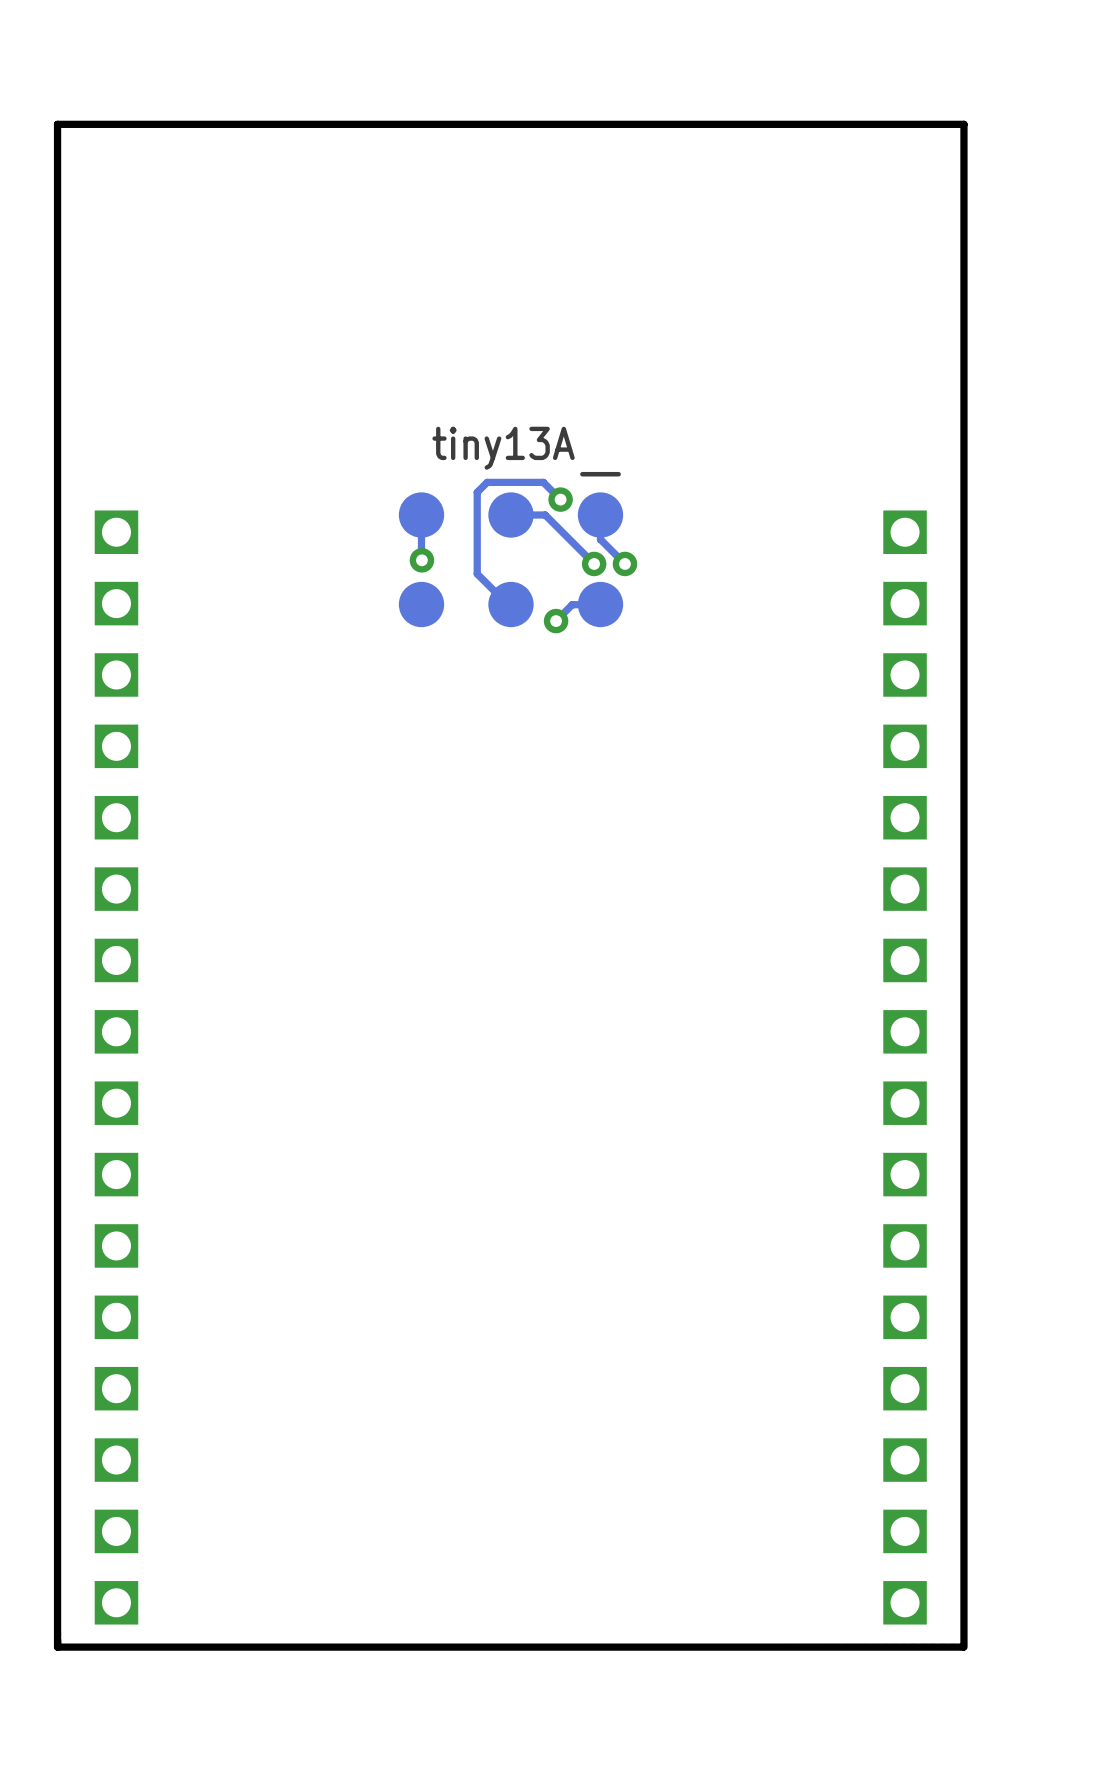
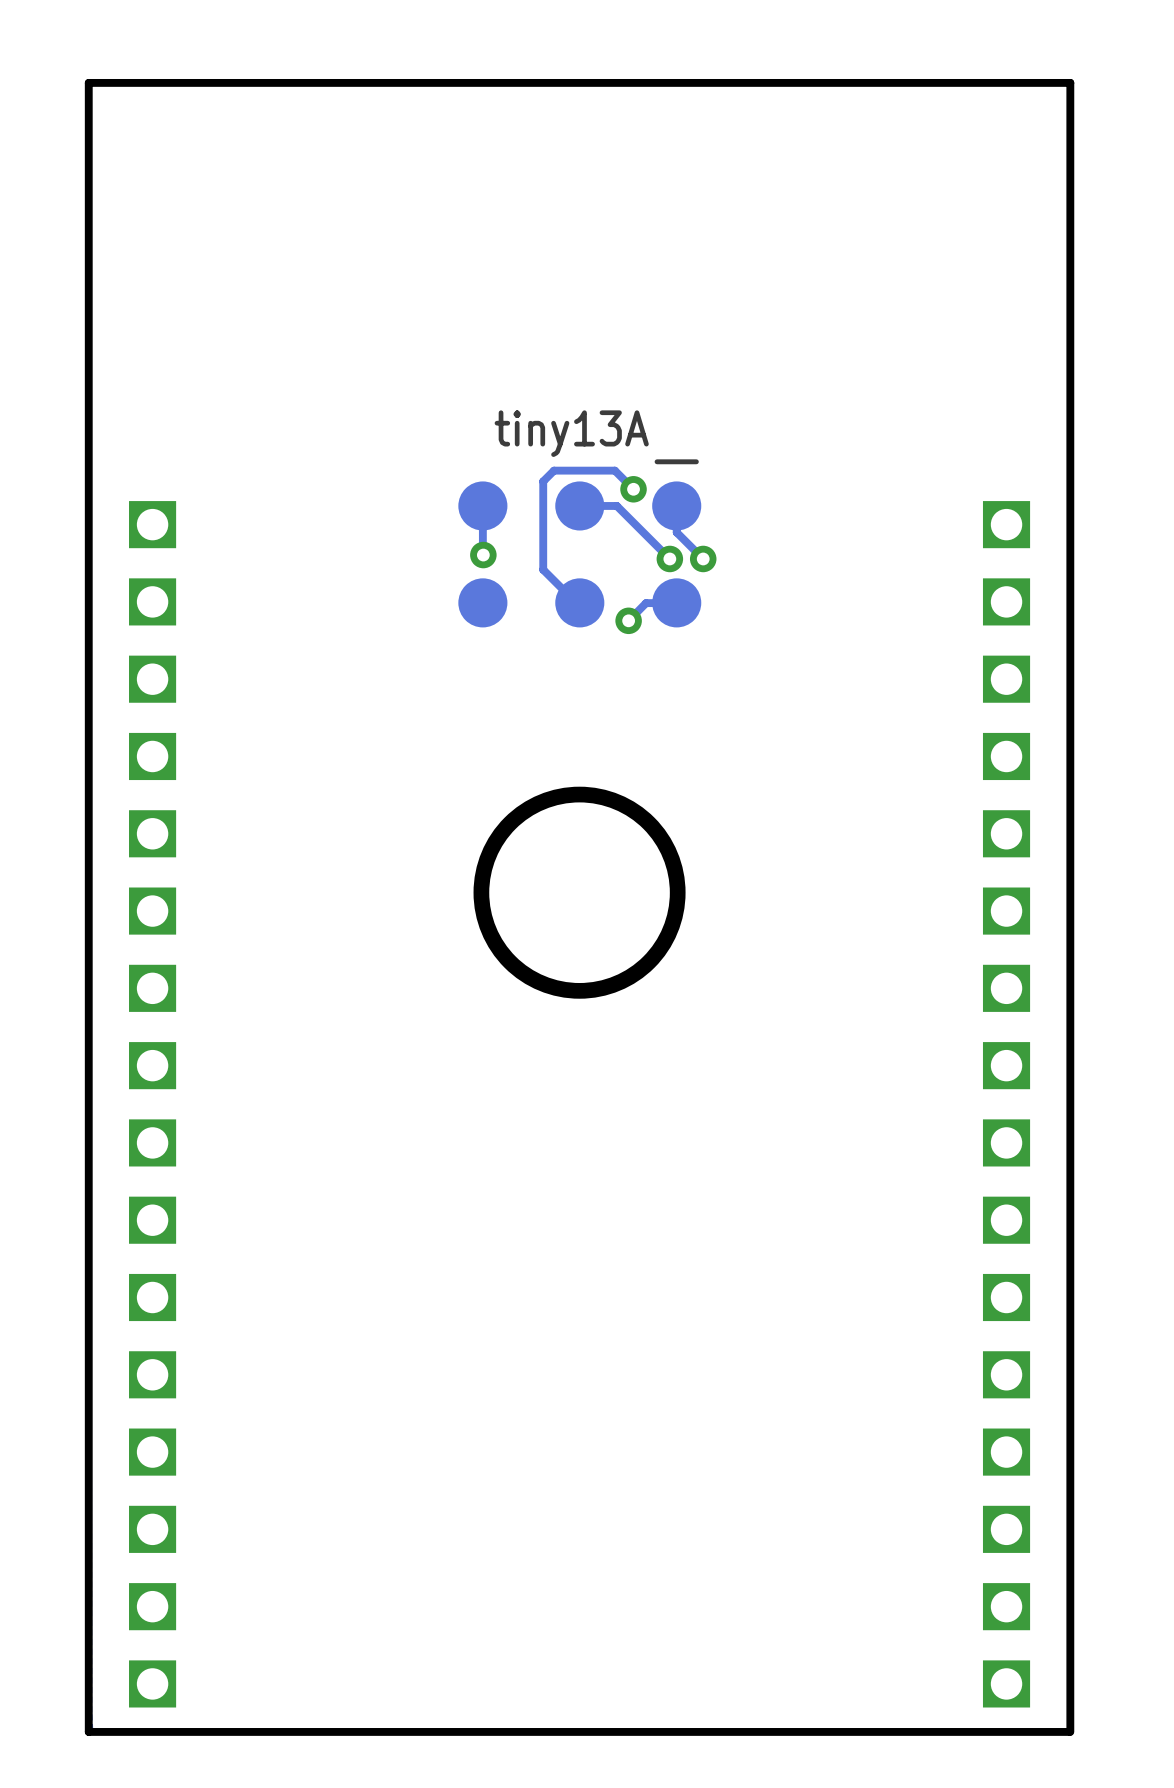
round board edge: none -> [473, 786, 686, 999]

